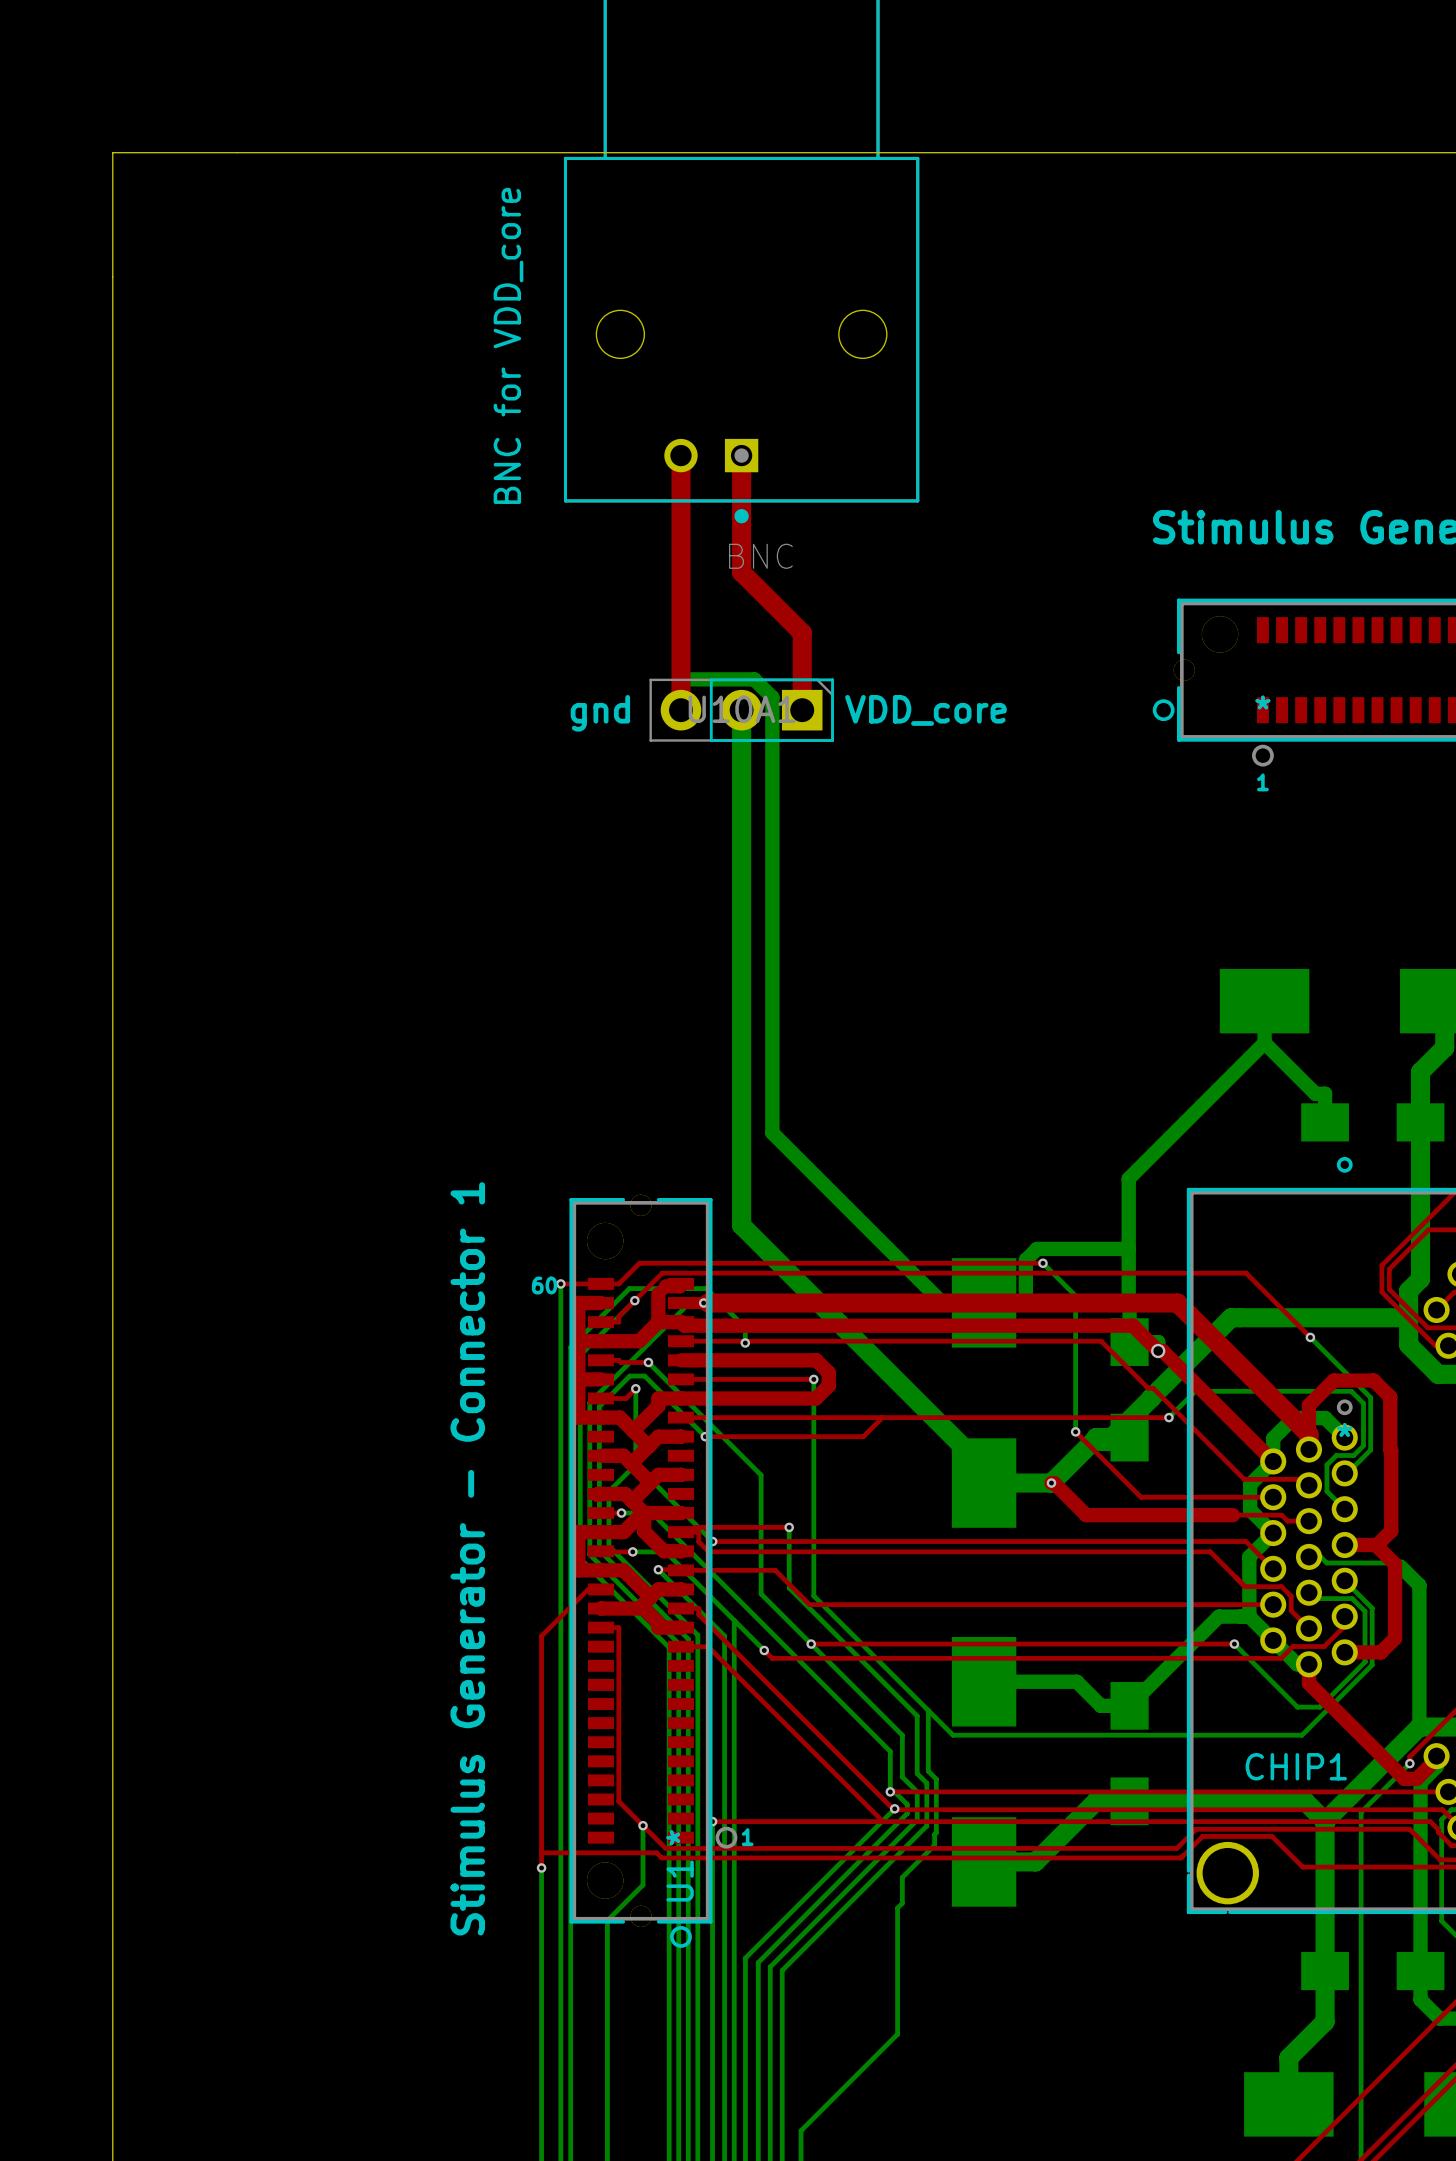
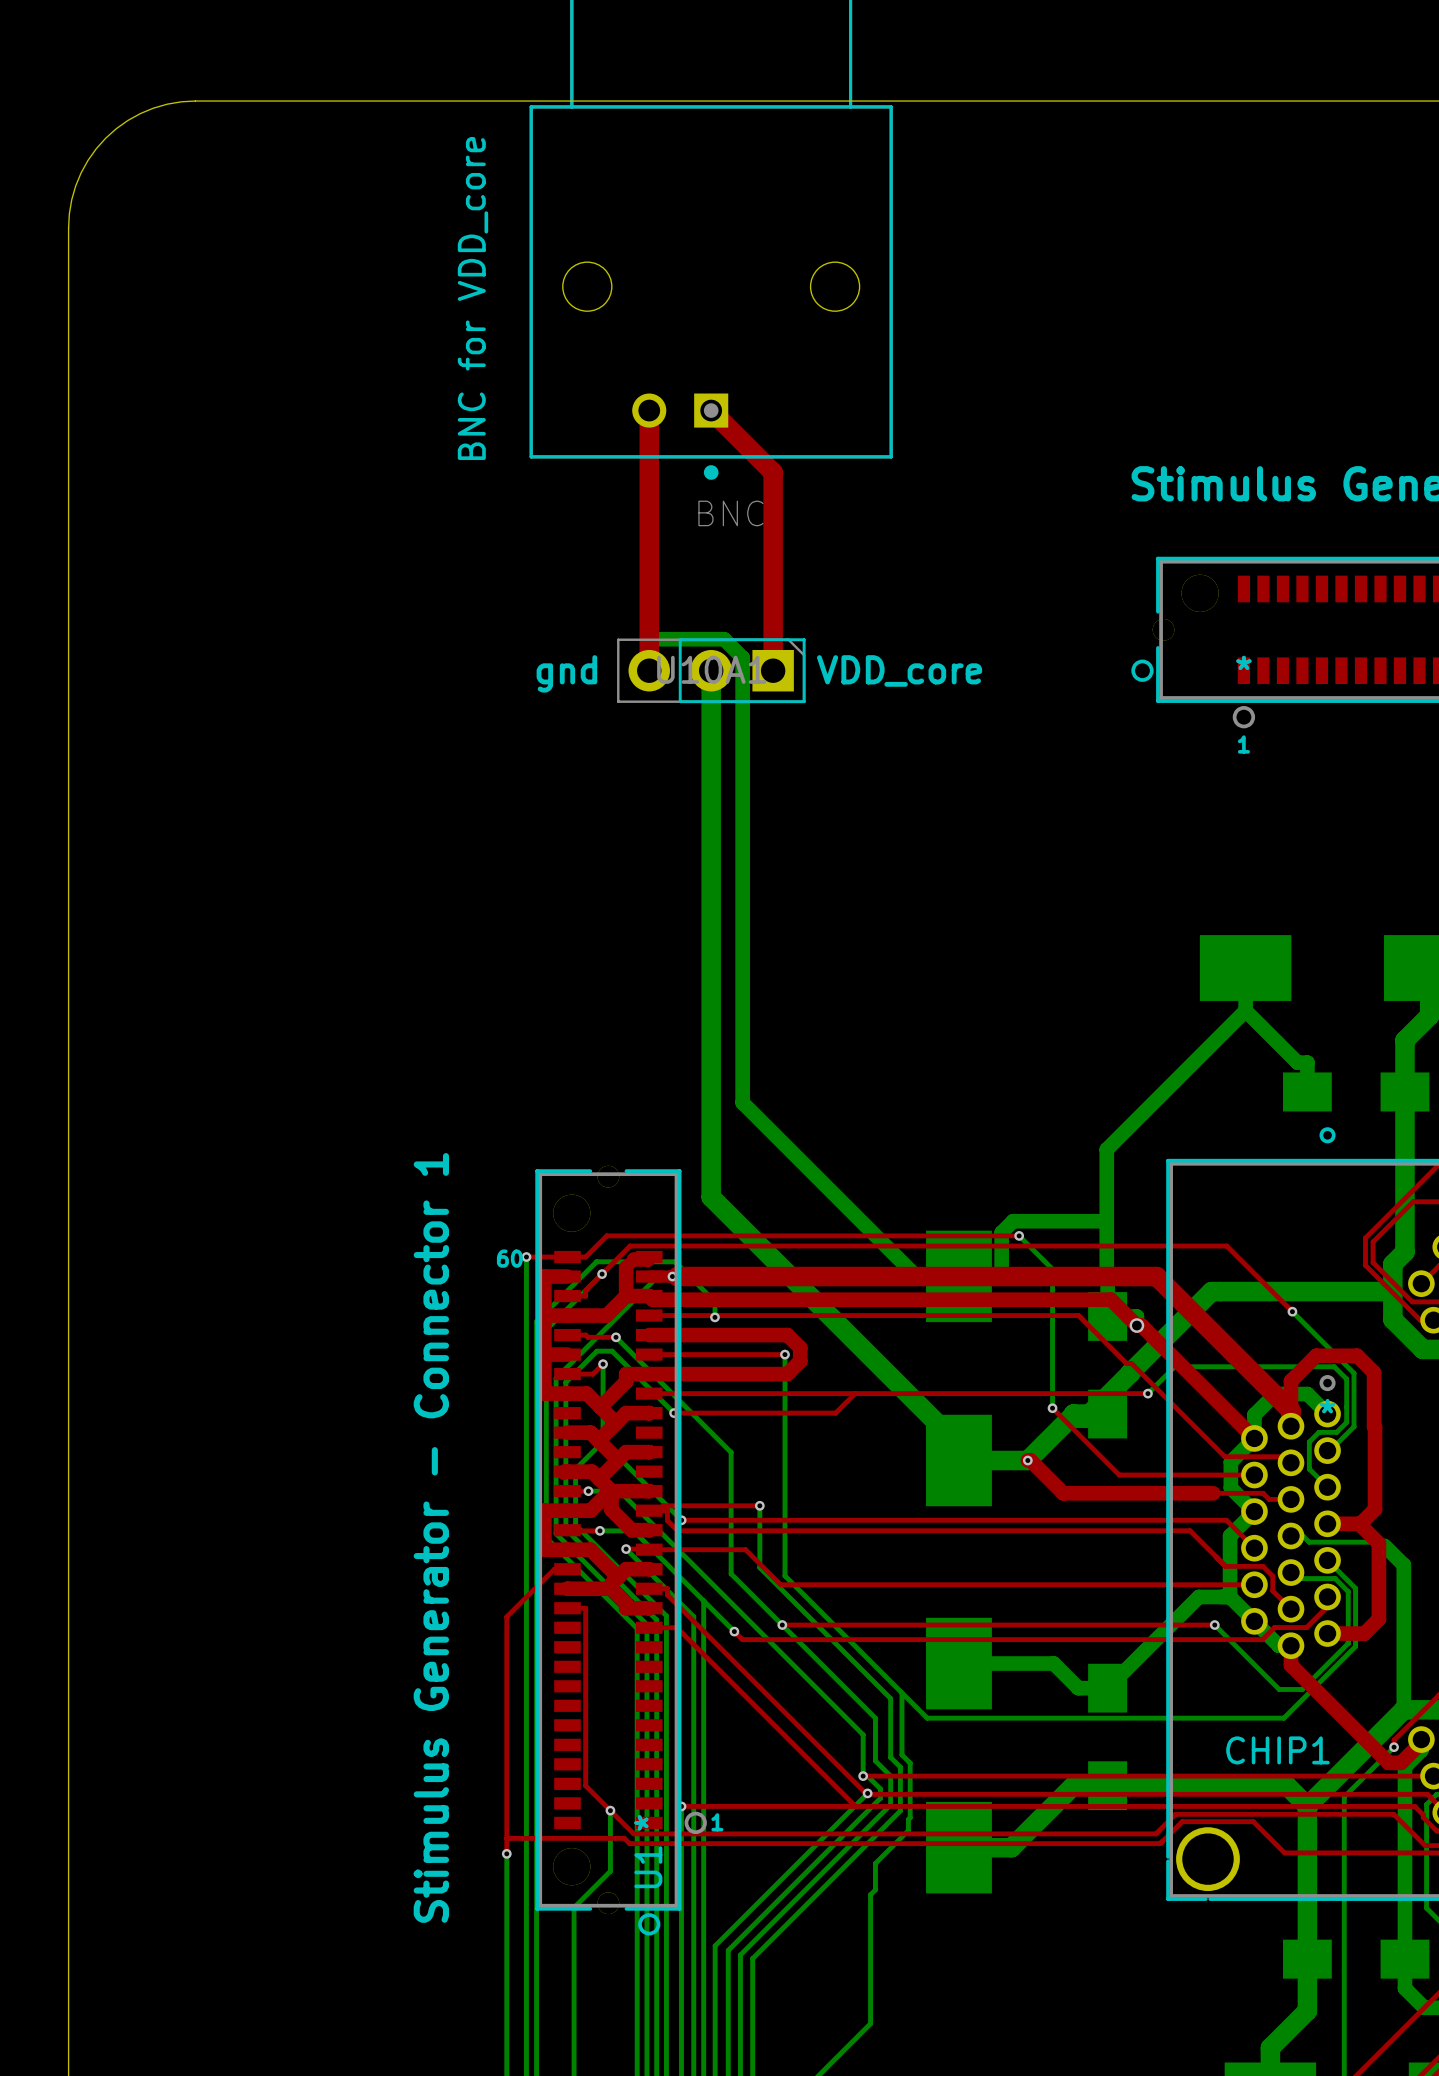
board edge: (236, 152) (112, 152) (112, 276) -> (195, 101) (167, 104) (140, 113) (116, 128) (105, 138) (88, 160) (75, 185) (71, 199) (68, 227)
top track: (741, 455) (741, 572) (802, 632) -> (711, 410) (773, 472) (773, 591)

